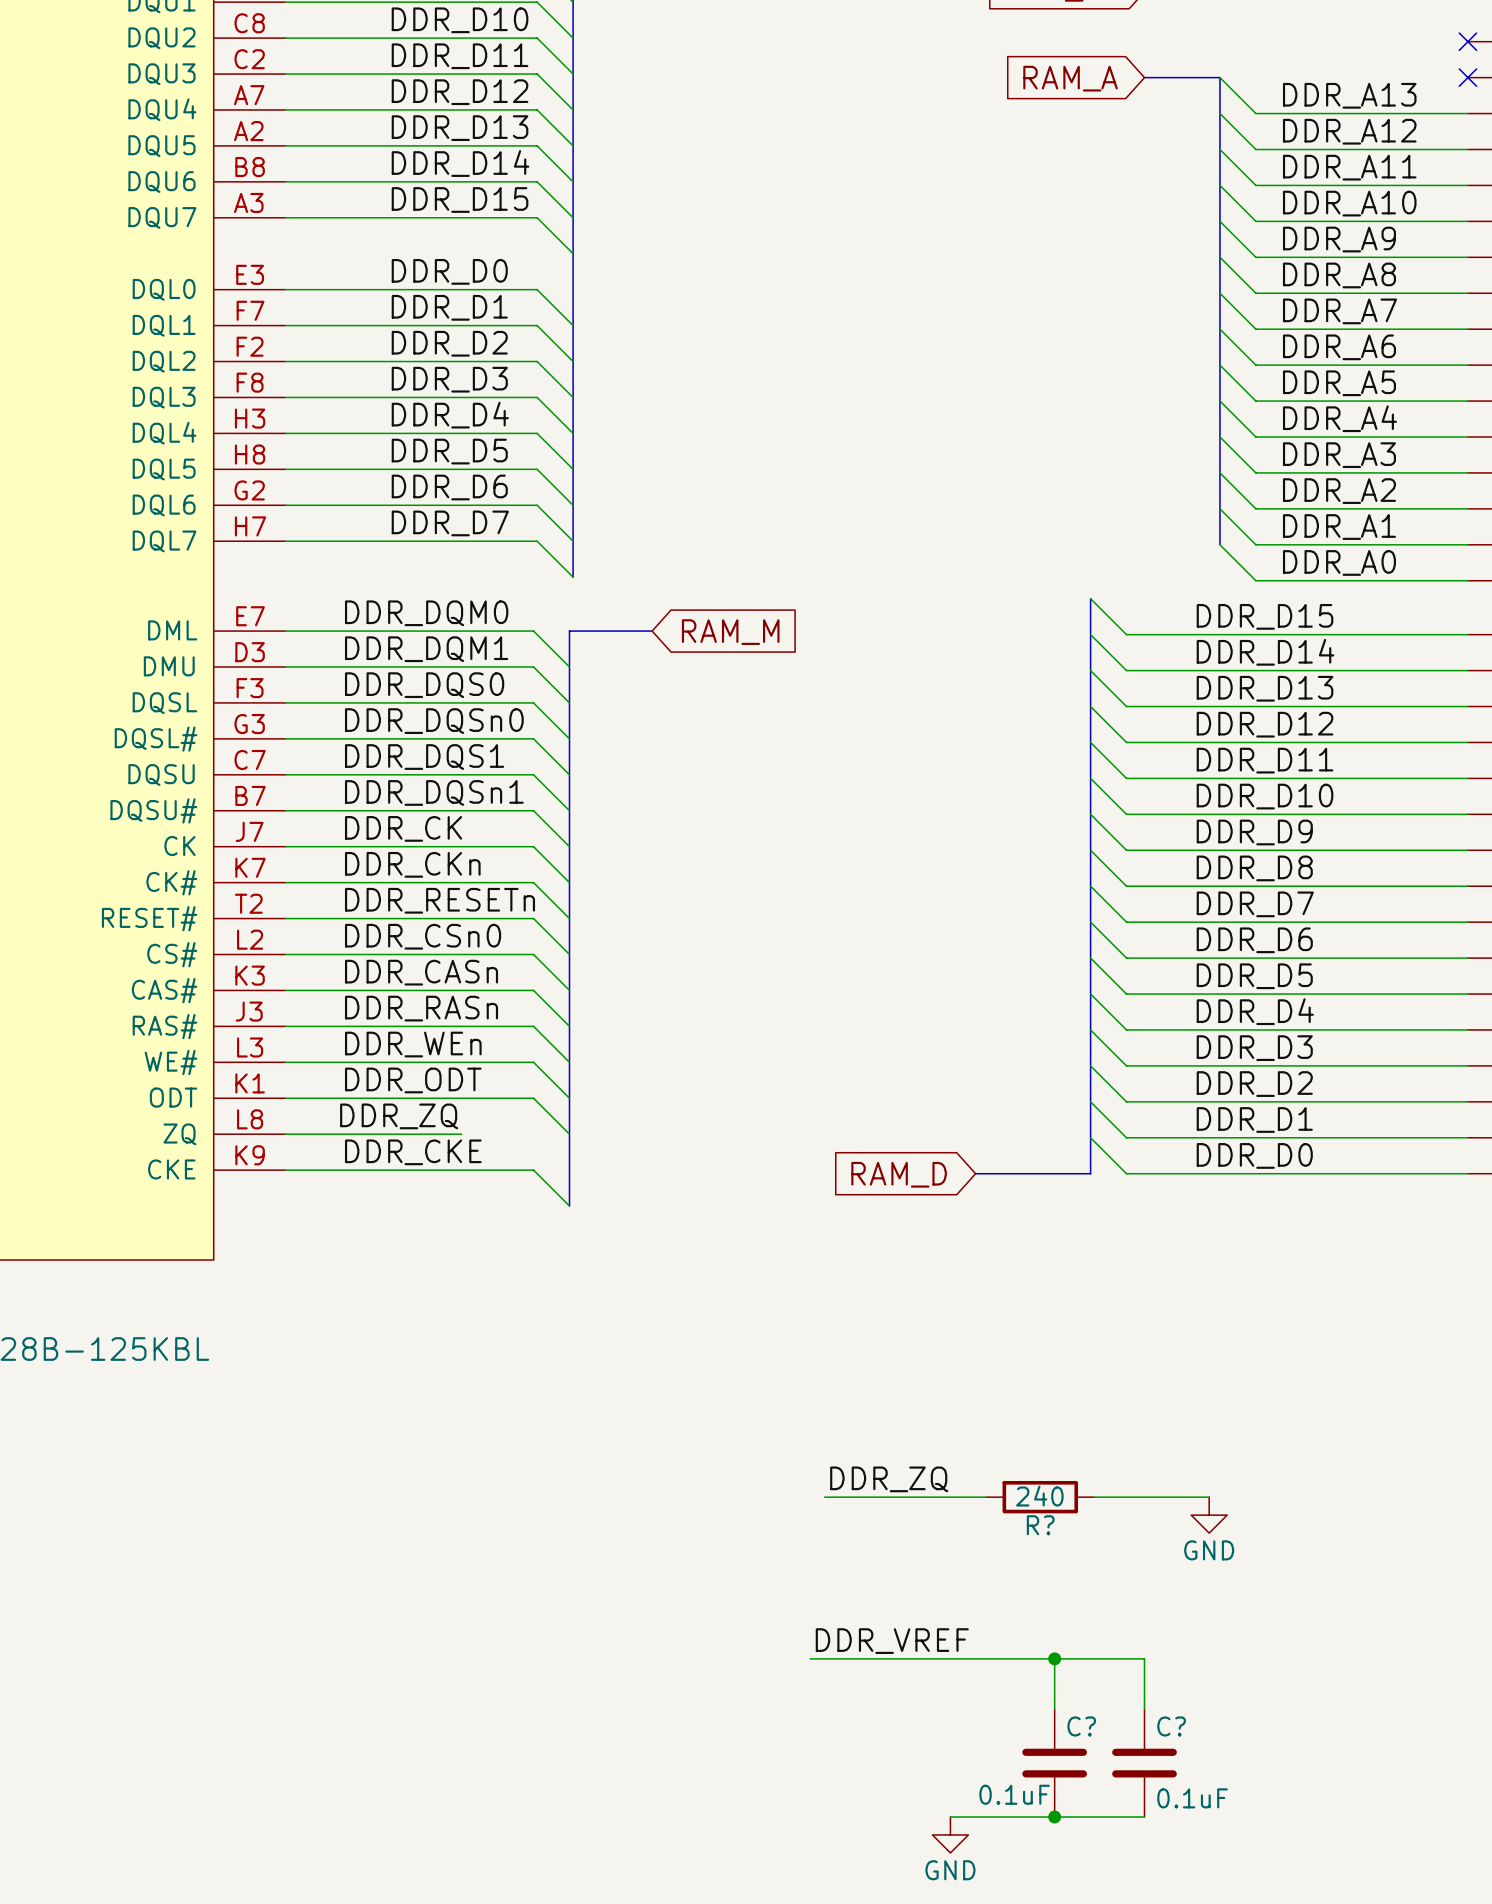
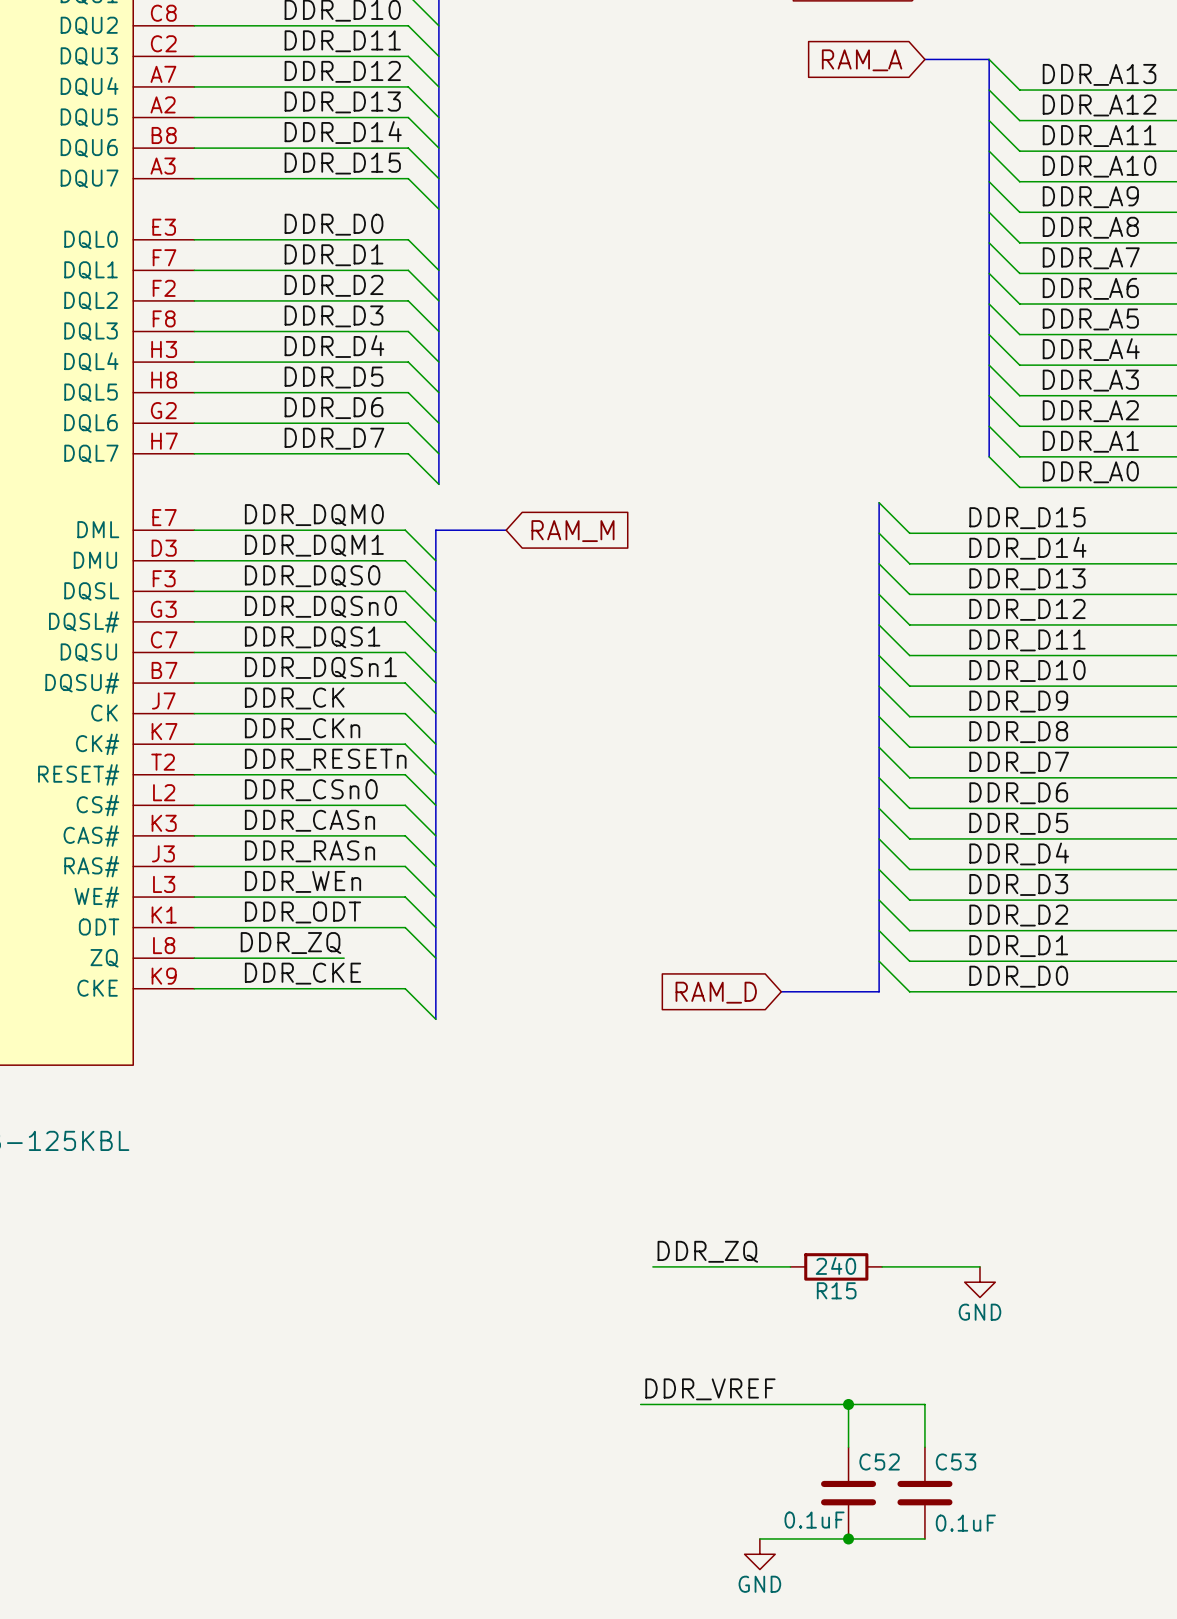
R? name: R? (1040, 1525) -> R15 (836, 1290)
C? name: C? (1081, 1726) -> C52 (879, 1461)
C? name: C? (1171, 1726) -> C53 (956, 1461)

